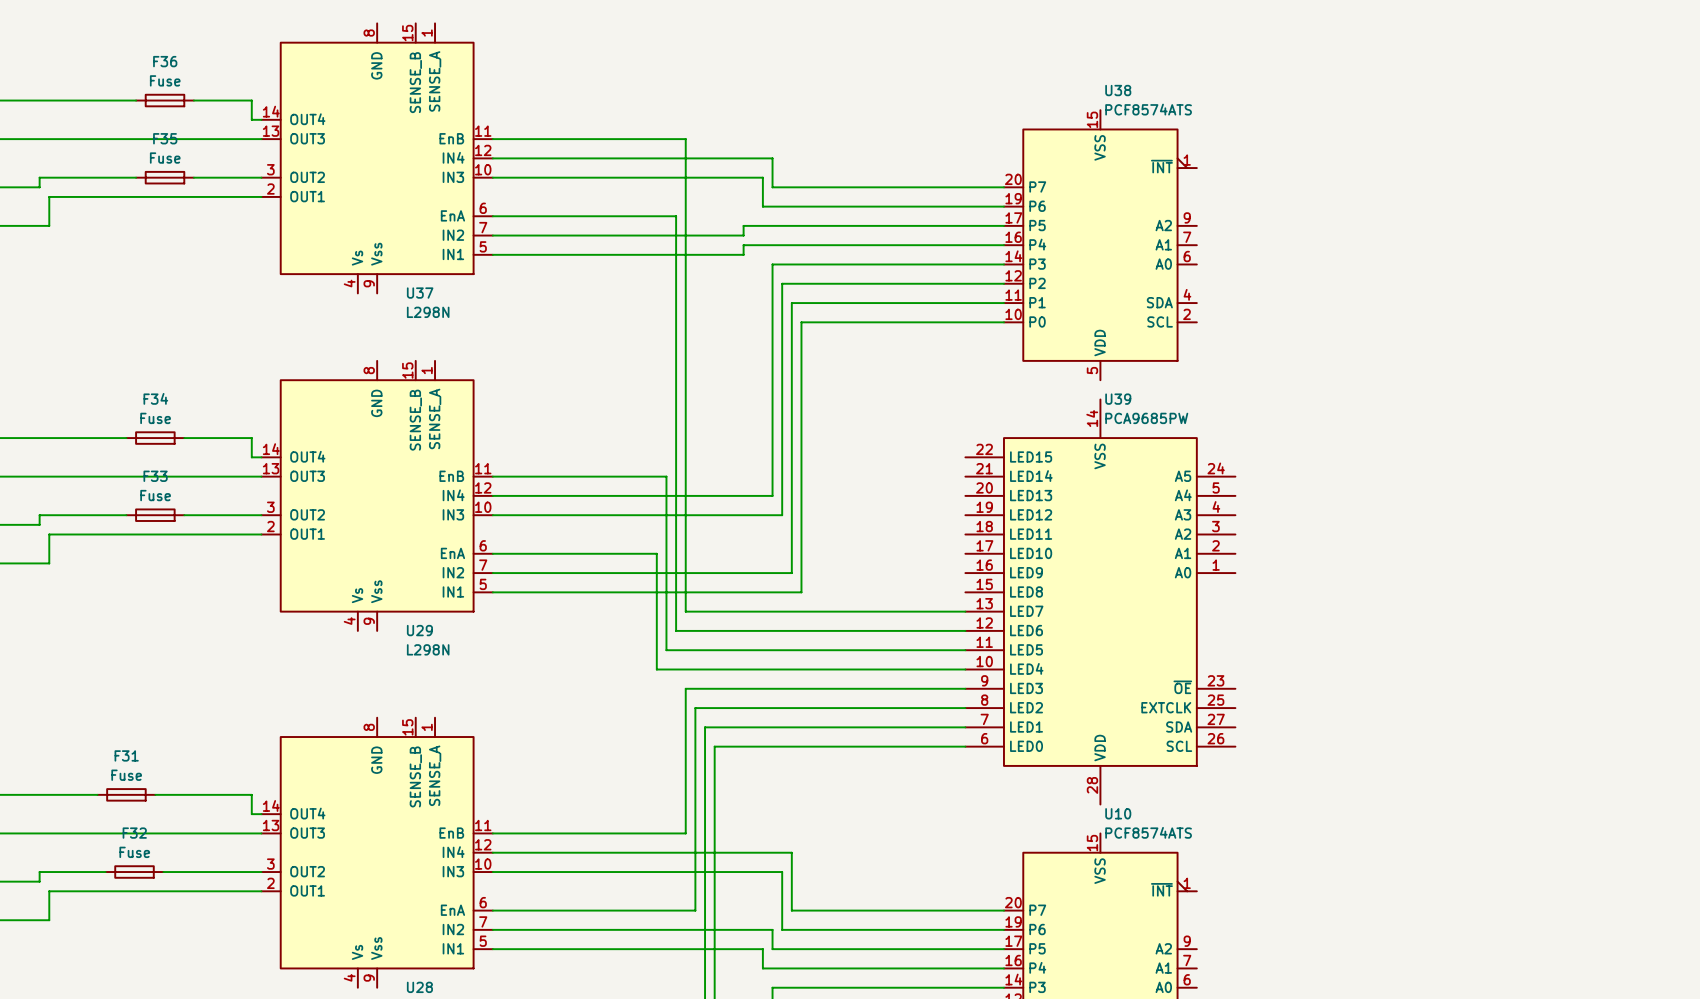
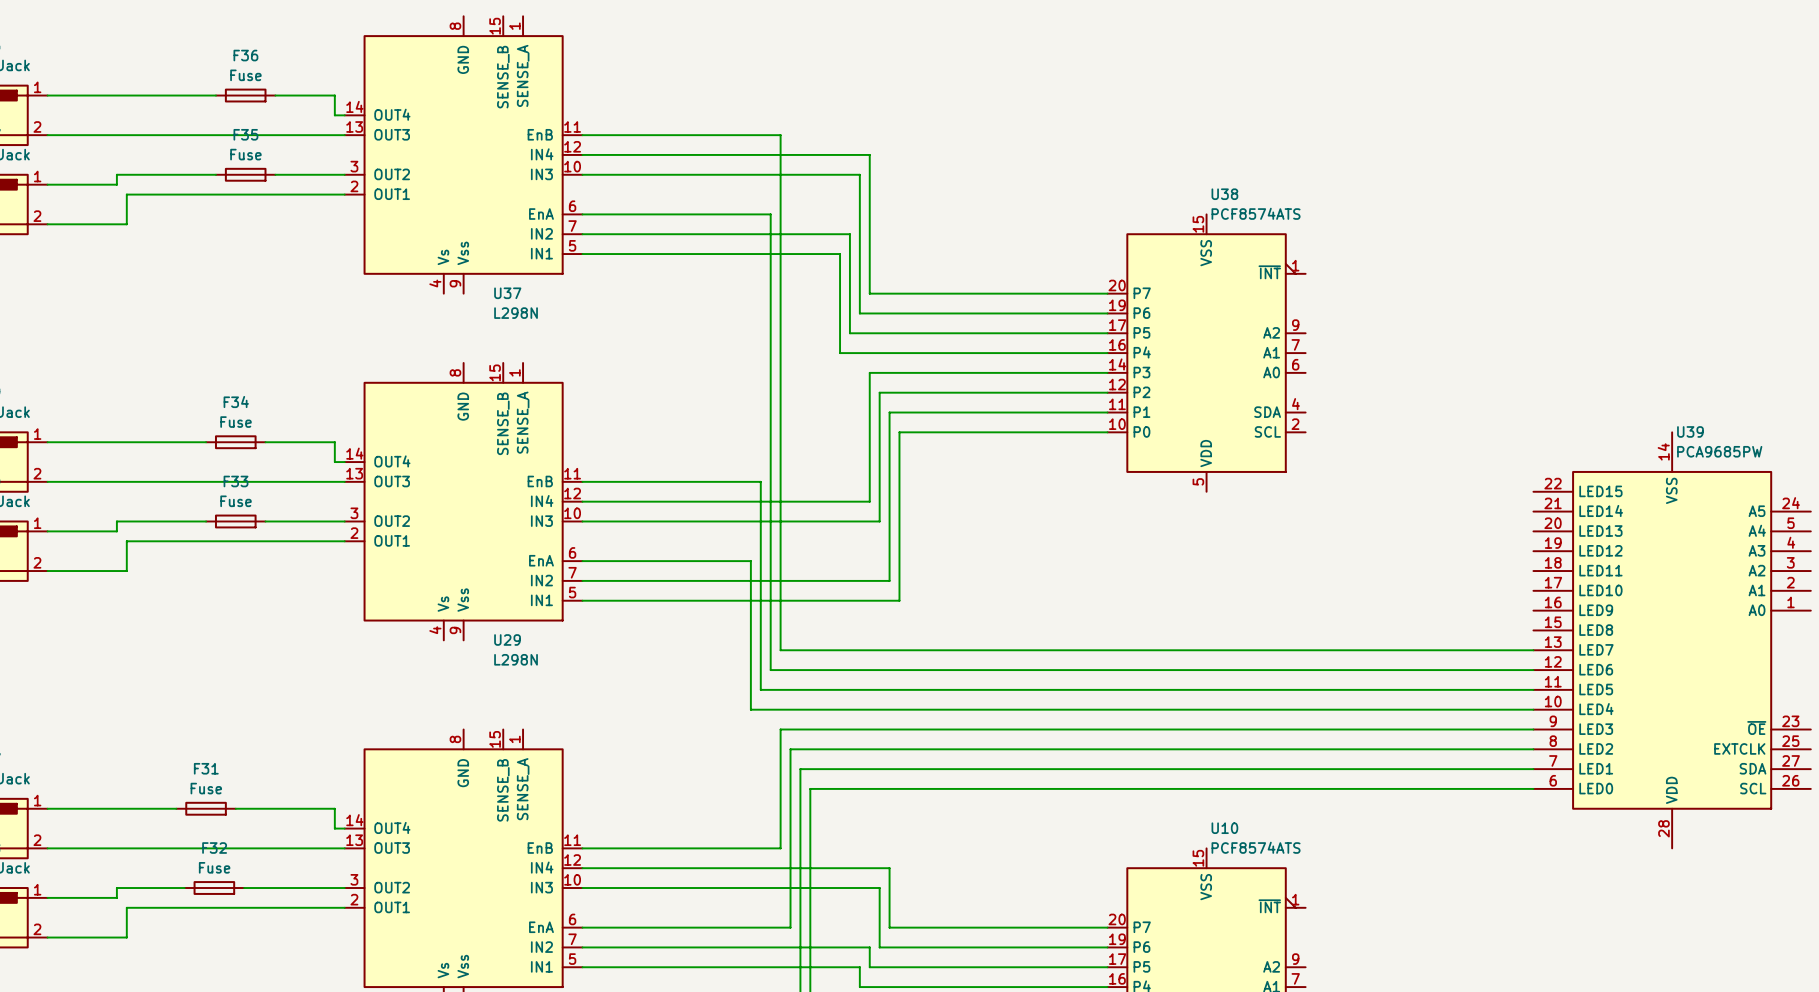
wire: (772, 187) (1003, 187) -> (869, 184) (869, 263)
wire: (762, 206) (1003, 206) -> (859, 204) (859, 313) (1107, 313)
wire: (1003, 225) (743, 225) (743, 235) -> (1107, 333) (849, 333) (849, 234) (840, 234)
wire: (1003, 245) (743, 245) (743, 254) -> (1107, 353) (840, 353) (840, 254)
U38 position: (1100, 245) -> (1206, 353)
wire: (772, 264) (1003, 264) -> (869, 372) (1107, 372)
wire: (1003, 283) (782, 283) (782, 389) -> (1107, 392) (879, 392)
wire: (772, 293) (772, 370) -> (869, 293) (1107, 293)
wire: (1003, 303) (791, 303) (791, 409) -> (1107, 412) (889, 412)
wire: (1003, 322) (801, 322) (801, 428) -> (1107, 432) (899, 432)
U39 position: (1100, 601) -> (1672, 640)
wire: (685, 611) (965, 611) -> (780, 620) (780, 650) (1533, 650)
wire: (676, 630) (965, 630) -> (770, 640) (770, 670) (1533, 670)
wire: (666, 650) (965, 650) -> (760, 660) (760, 689) (1533, 689)
wire: (656, 669) (965, 669) -> (750, 679) (750, 709) (1533, 709)
wire: (965, 688) (685, 688) (685, 717) -> (1533, 729) (780, 729)
wire: (965, 708) (695, 708) (695, 737) -> (1533, 749) (790, 749)
wire: (965, 727) (705, 727) (705, 756) -> (1533, 769) (800, 769)
wire: (965, 746) (714, 746) (714, 775) -> (1533, 788) (810, 788)

